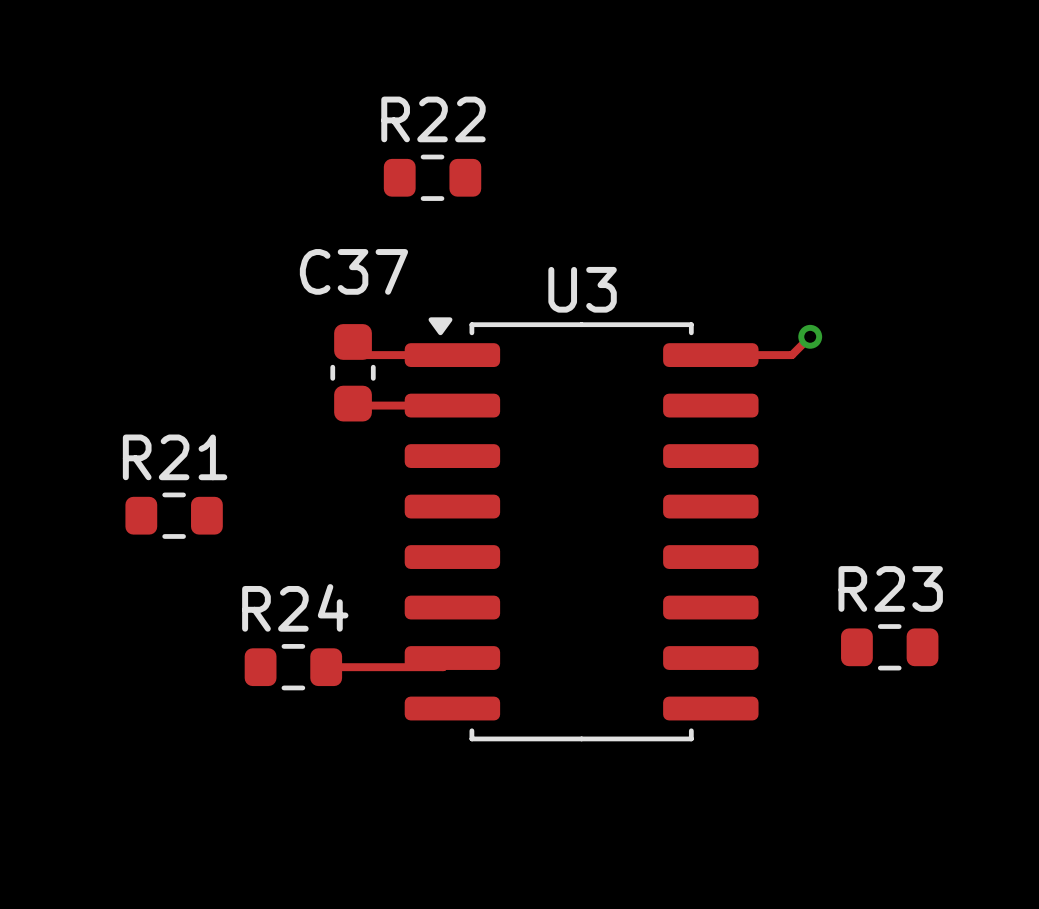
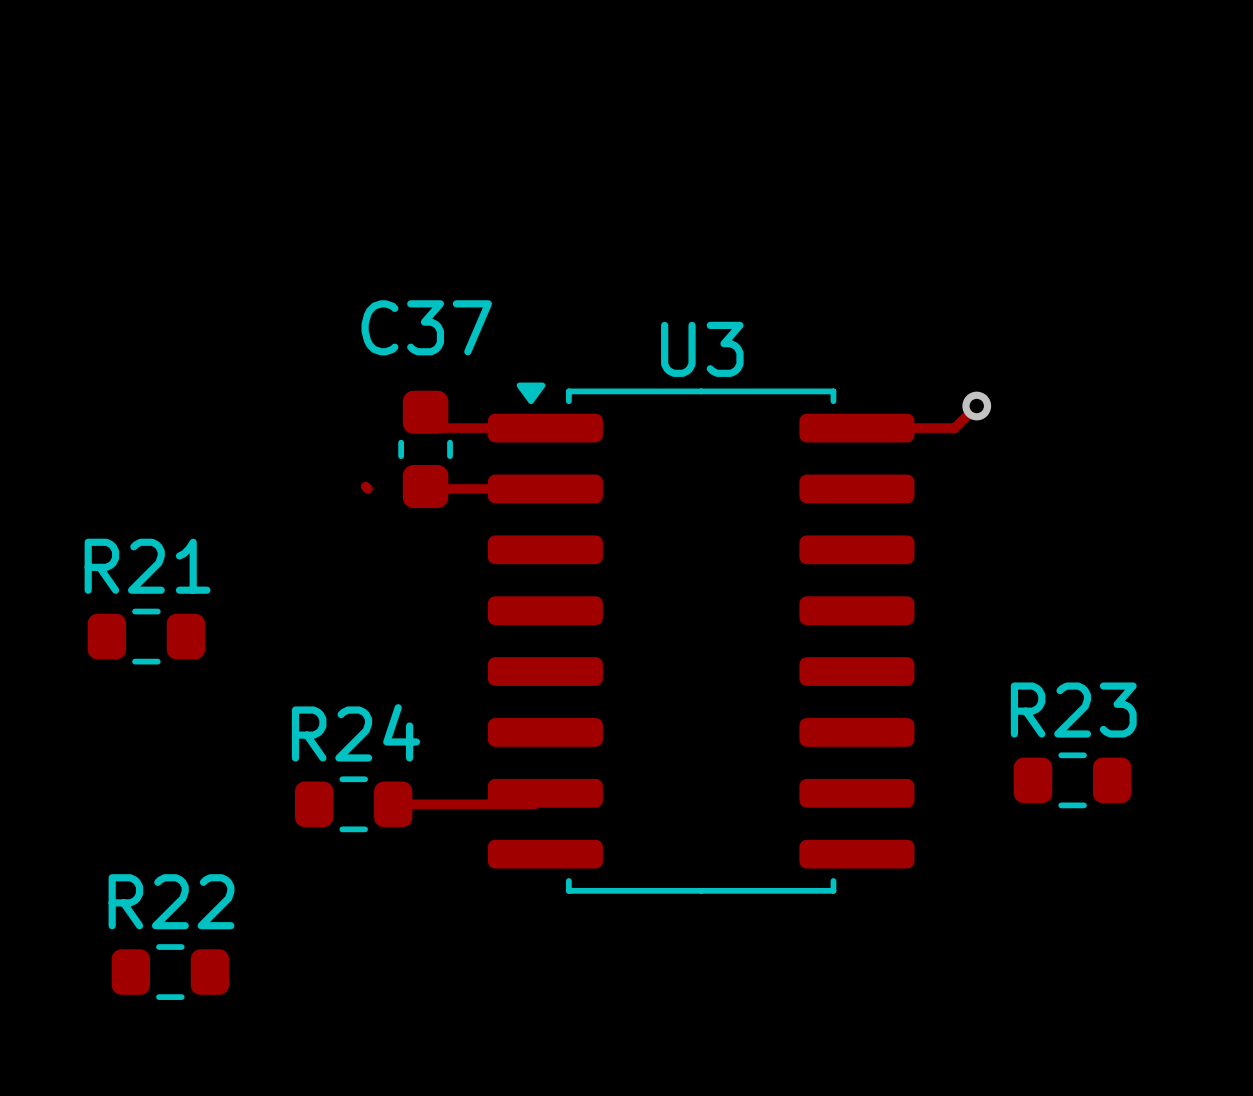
R22 position: (432, 177) -> (170, 972)
track: none -> (365, 486) (368, 488)
R21 position: (174, 515) -> (146, 636)

